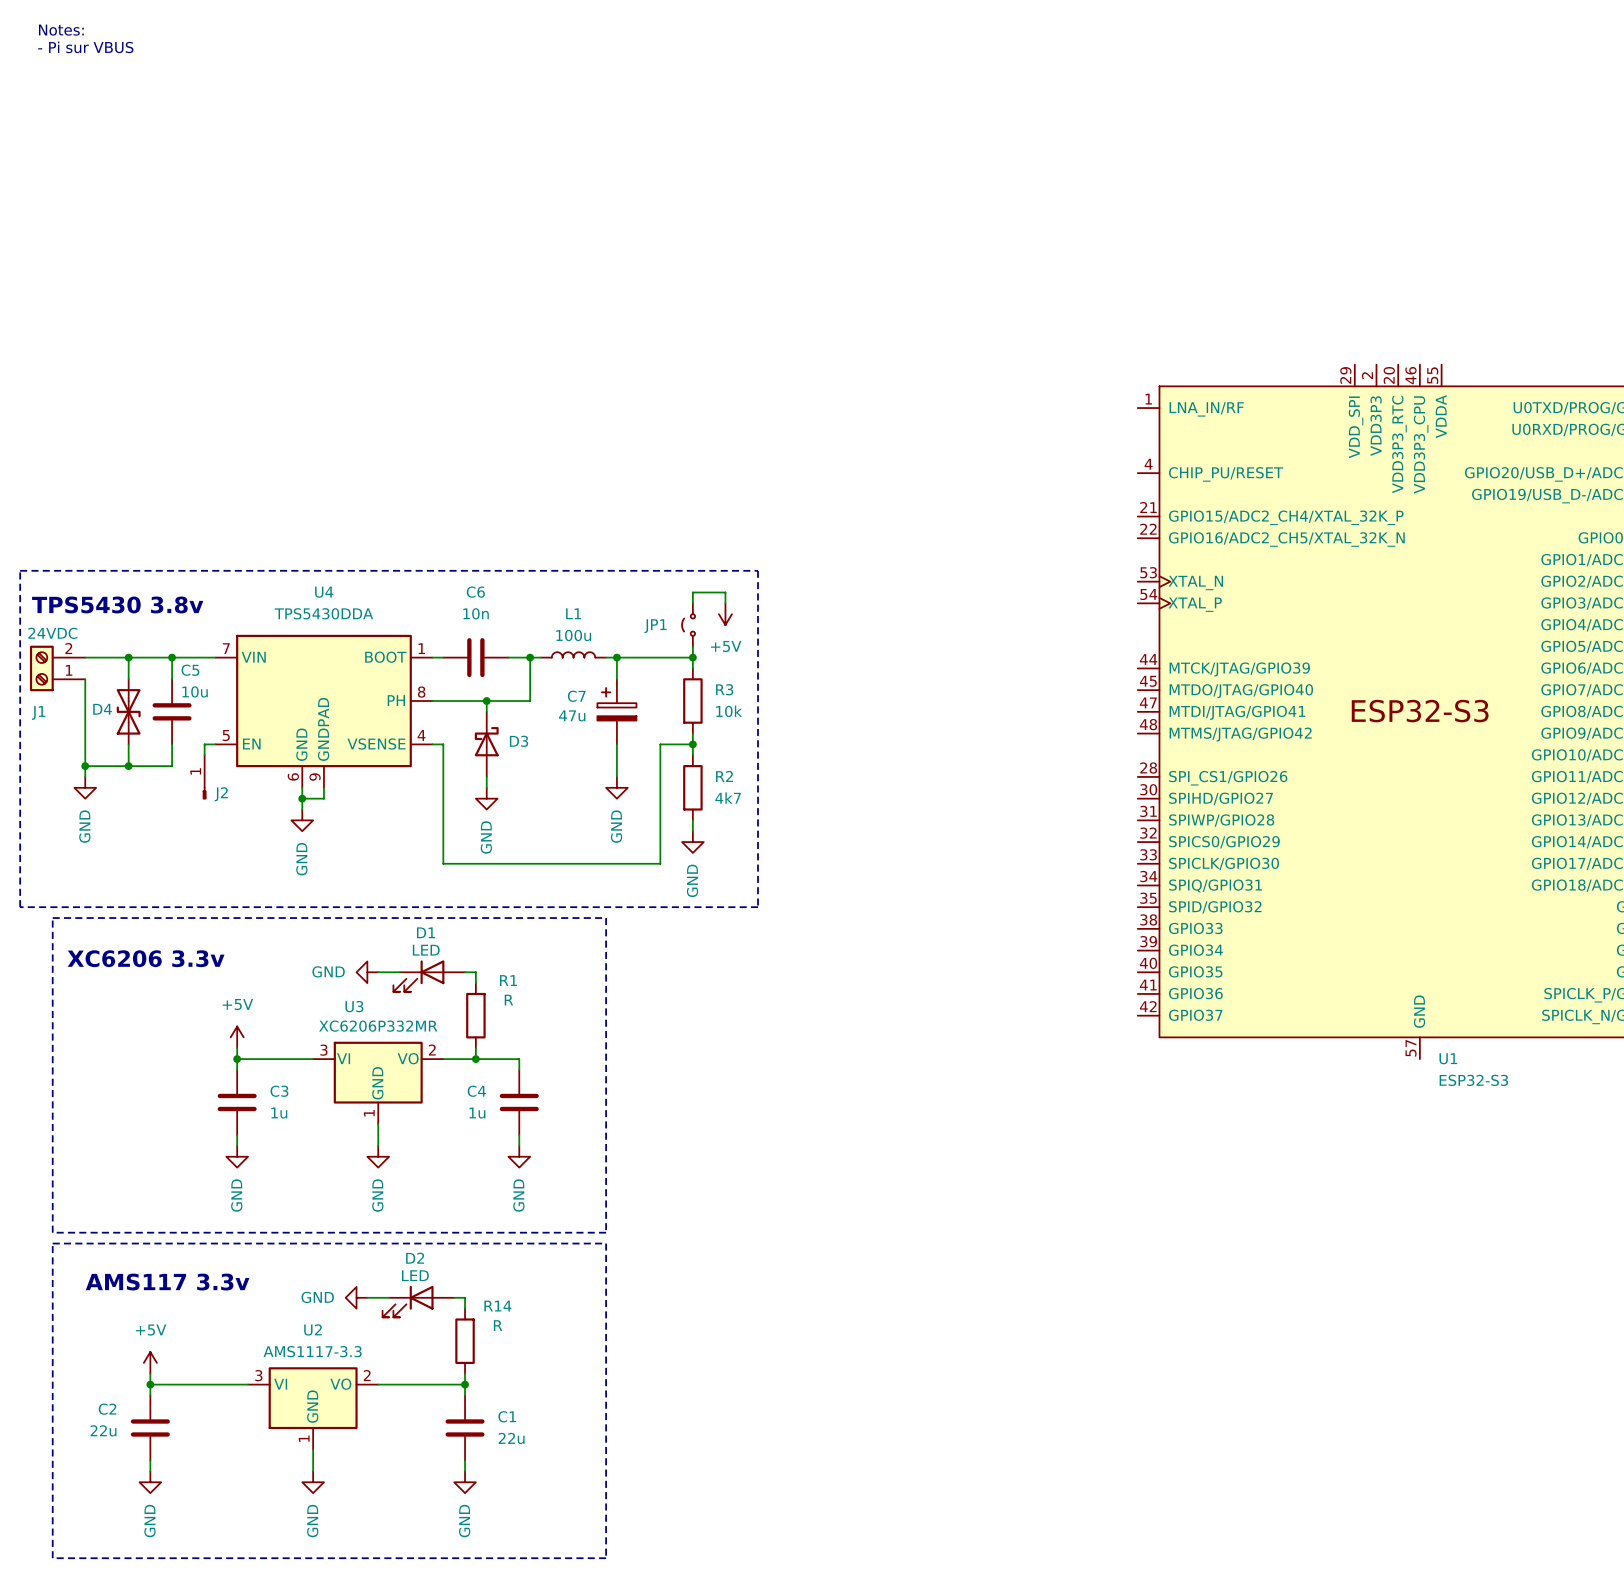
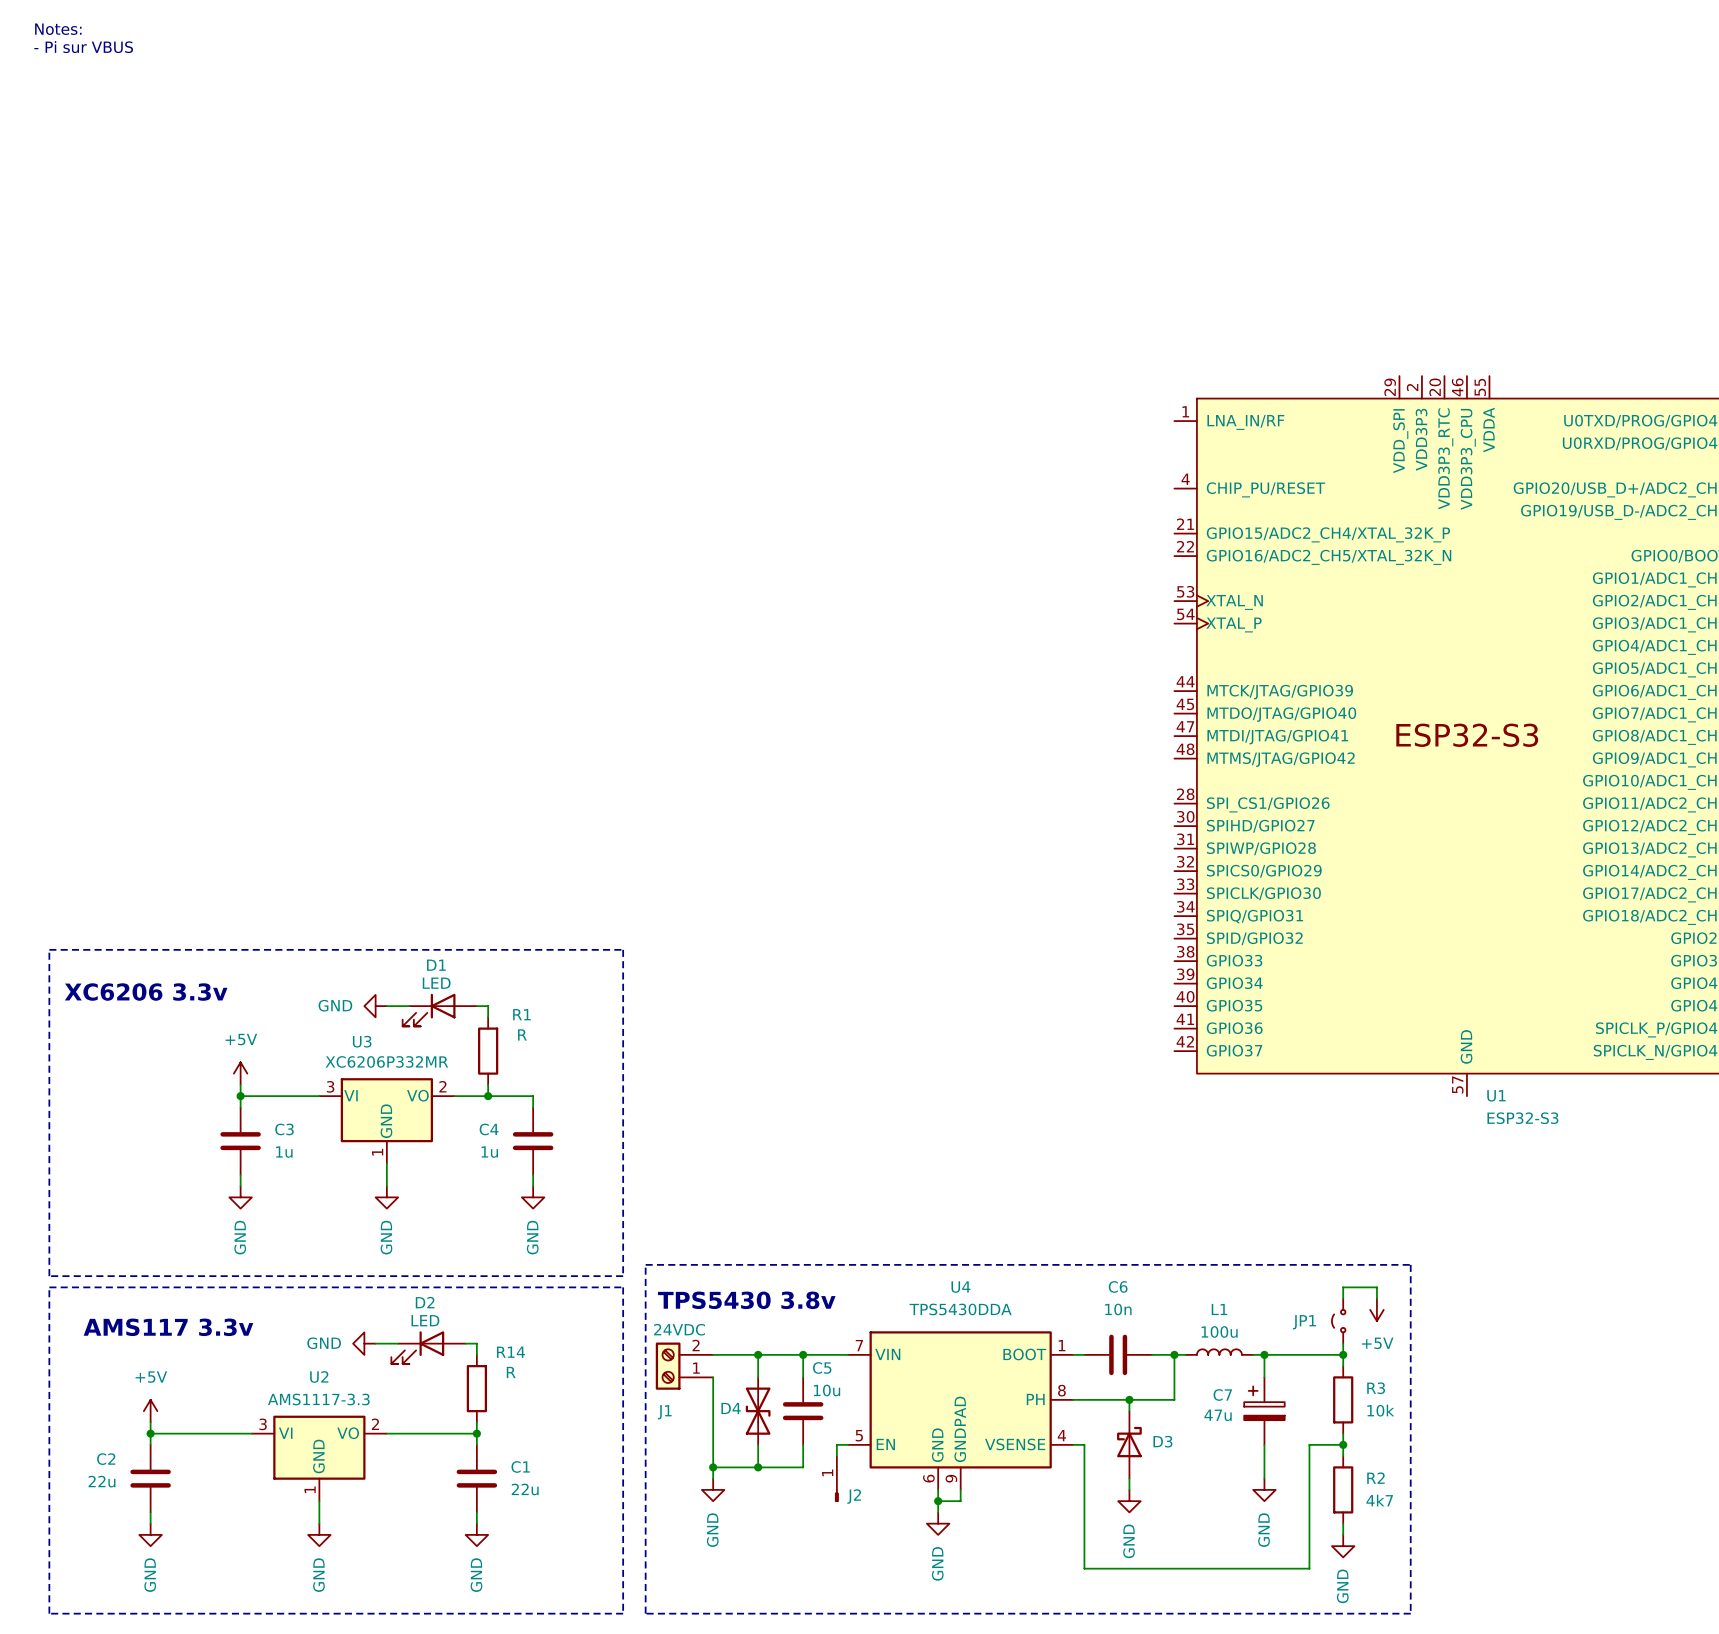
line: (20, 570) (758, 570) (758, 907) (20, 907) (20, 570) -> none
wire: (692, 603) (692, 592) (725, 592) (725, 603) -> none
text: TPS5430 3.8v (117, 604) -> none
power symbol: +5V (725, 614) -> none
JP1 position: (688, 625) -> (1338, 1321)
wire: (692, 646) (692, 668) -> none
L1 position: (573, 654) -> (1219, 1352)
wire: (85, 657) (215, 657) -> none
wire: (128, 657) (128, 679) -> none
junction: (128, 657) -> none
wire: (172, 657) (172, 679) -> none
junction: (172, 657) -> none
wire: (432, 657) (443, 657) -> none
C6 position: (475, 657) -> (1118, 1354)
wire: (508, 657) (540, 657) -> none
wire: (530, 657) (530, 701) (432, 701) -> none
junction: (530, 657) -> none
wire: (606, 657) (692, 657) -> none
wire: (616, 657) (616, 679) -> none
junction: (616, 657) -> none
junction: (692, 657) -> none
J1 position: (57, 668) -> (684, 1366)
wire: (85, 679) (85, 776) -> none
wire: (486, 701) (486, 711) -> none
junction: (486, 701) -> none
R3 position: (692, 701) -> (1343, 1399)
D4 position: (128, 711) -> (758, 1411)
C5 position: (172, 711) -> (803, 1411)
U4 position: (323, 711) -> (960, 1410)
C7 position: (616, 711) -> (1264, 1411)
wire: (692, 733) (692, 755) -> none
wire: (128, 744) (128, 766) -> none
wire: (172, 744) (172, 766) (85, 766) -> none
wire: (215, 744) (204, 744) (204, 755) -> none
wire: (432, 744) (443, 744) (443, 863) (660, 863) (660, 744) (692, 744) -> none
D3 position: (486, 744) -> (1129, 1444)
wire: (616, 744) (616, 776) -> none
junction: (692, 744) -> none
junction: (85, 766) -> none
junction: (128, 766) -> none
wire: (486, 776) (486, 787) -> none
J2 position: (204, 777) -> (836, 1478)
power symbol: GND (85, 787) -> none
wire: (302, 787) (302, 809) -> none
wire: (323, 787) (323, 798) (302, 798) -> none
power symbol: GND (616, 787) -> none
R2 position: (692, 787) -> (1343, 1489)
junction: (302, 798) -> none
power symbol: GND (486, 798) -> none
power symbol: GND (302, 820) -> none
wire: (692, 820) (692, 831) -> none
power symbol: GND (692, 842) -> none
line: none -> (645, 1264) (1410, 1264) (1410, 1613) (645, 1613) (645, 1264)
wire: none -> (1343, 1298) (1343, 1287) (1376, 1287) (1376, 1298)
text: none -> TPS5430 3.8v (746, 1300)
power symbol: none -> +5V (1376, 1309)
wire: none -> (1343, 1343) (1343, 1366)
wire: none -> (713, 1354) (848, 1354)
wire: none -> (758, 1354) (758, 1377)
junction: none -> (758, 1354)
wire: none -> (803, 1354) (803, 1377)
junction: none -> (803, 1354)
wire: none -> (1073, 1354) (1084, 1354)
wire: none -> (1151, 1354) (1185, 1354)
wire: none -> (1174, 1354) (1174, 1399) (1073, 1399)
junction: none -> (1174, 1354)
wire: none -> (1253, 1354) (1343, 1354)
wire: none -> (1264, 1354) (1264, 1377)
junction: none -> (1264, 1354)
junction: none -> (1343, 1354)
wire: none -> (713, 1377) (713, 1478)
wire: none -> (1129, 1399) (1129, 1411)
junction: none -> (1129, 1399)
wire: none -> (1343, 1433) (1343, 1456)
wire: none -> (758, 1444) (758, 1467)
wire: none -> (803, 1444) (803, 1467) (713, 1467)
wire: none -> (848, 1444) (836, 1444) (836, 1456)
wire: none -> (1073, 1444) (1084, 1444) (1084, 1568) (1309, 1568) (1309, 1444) (1343, 1444)
wire: none -> (1264, 1444) (1264, 1478)
junction: none -> (1343, 1444)
junction: none -> (713, 1467)
junction: none -> (758, 1467)
wire: none -> (1129, 1478) (1129, 1489)
power symbol: none -> GND (713, 1489)
wire: none -> (938, 1489) (938, 1512)
wire: none -> (960, 1489) (960, 1501) (938, 1501)
power symbol: none -> GND (1264, 1489)
junction: none -> (938, 1501)
power symbol: none -> GND (1129, 1501)
power symbol: none -> GND (938, 1523)
wire: none -> (1343, 1523) (1343, 1534)
power symbol: none -> GND (1343, 1546)

